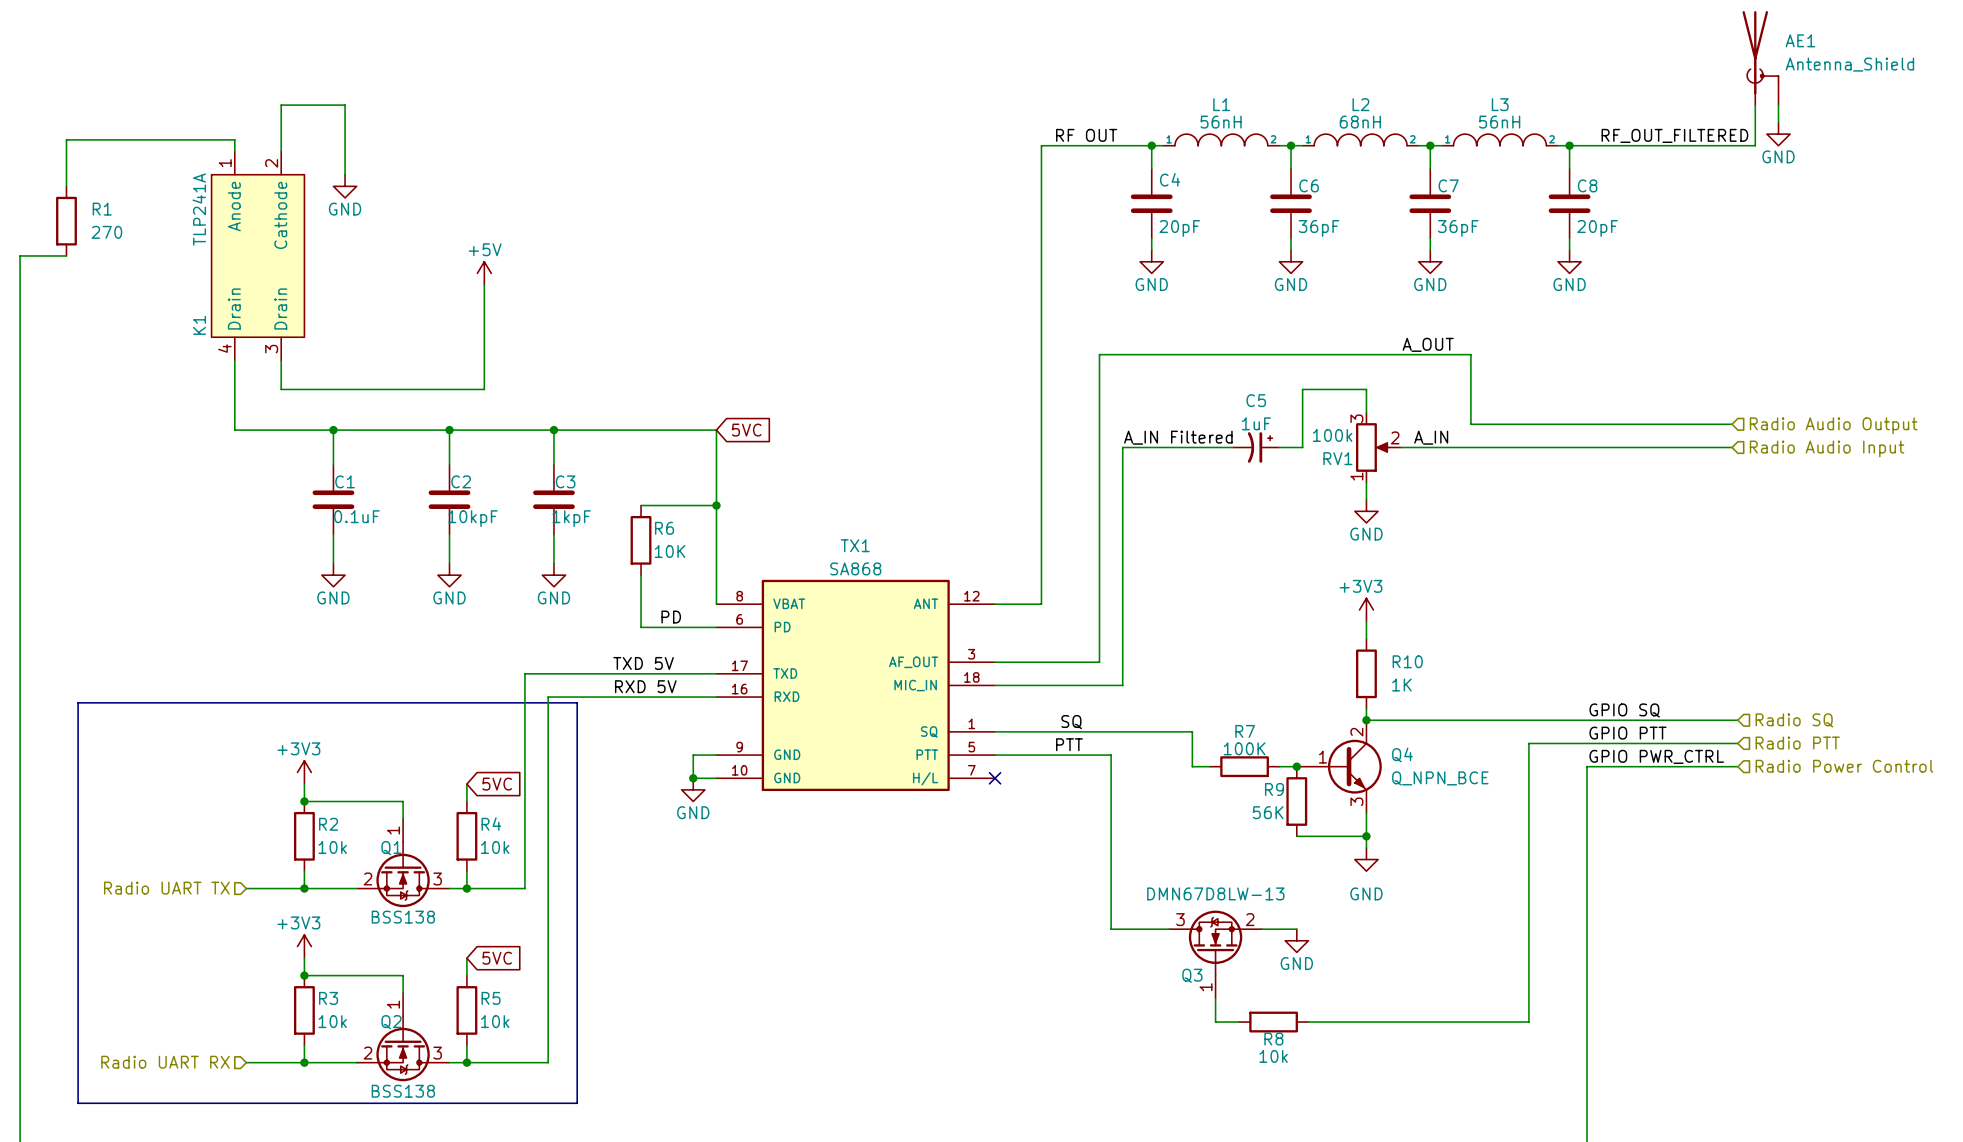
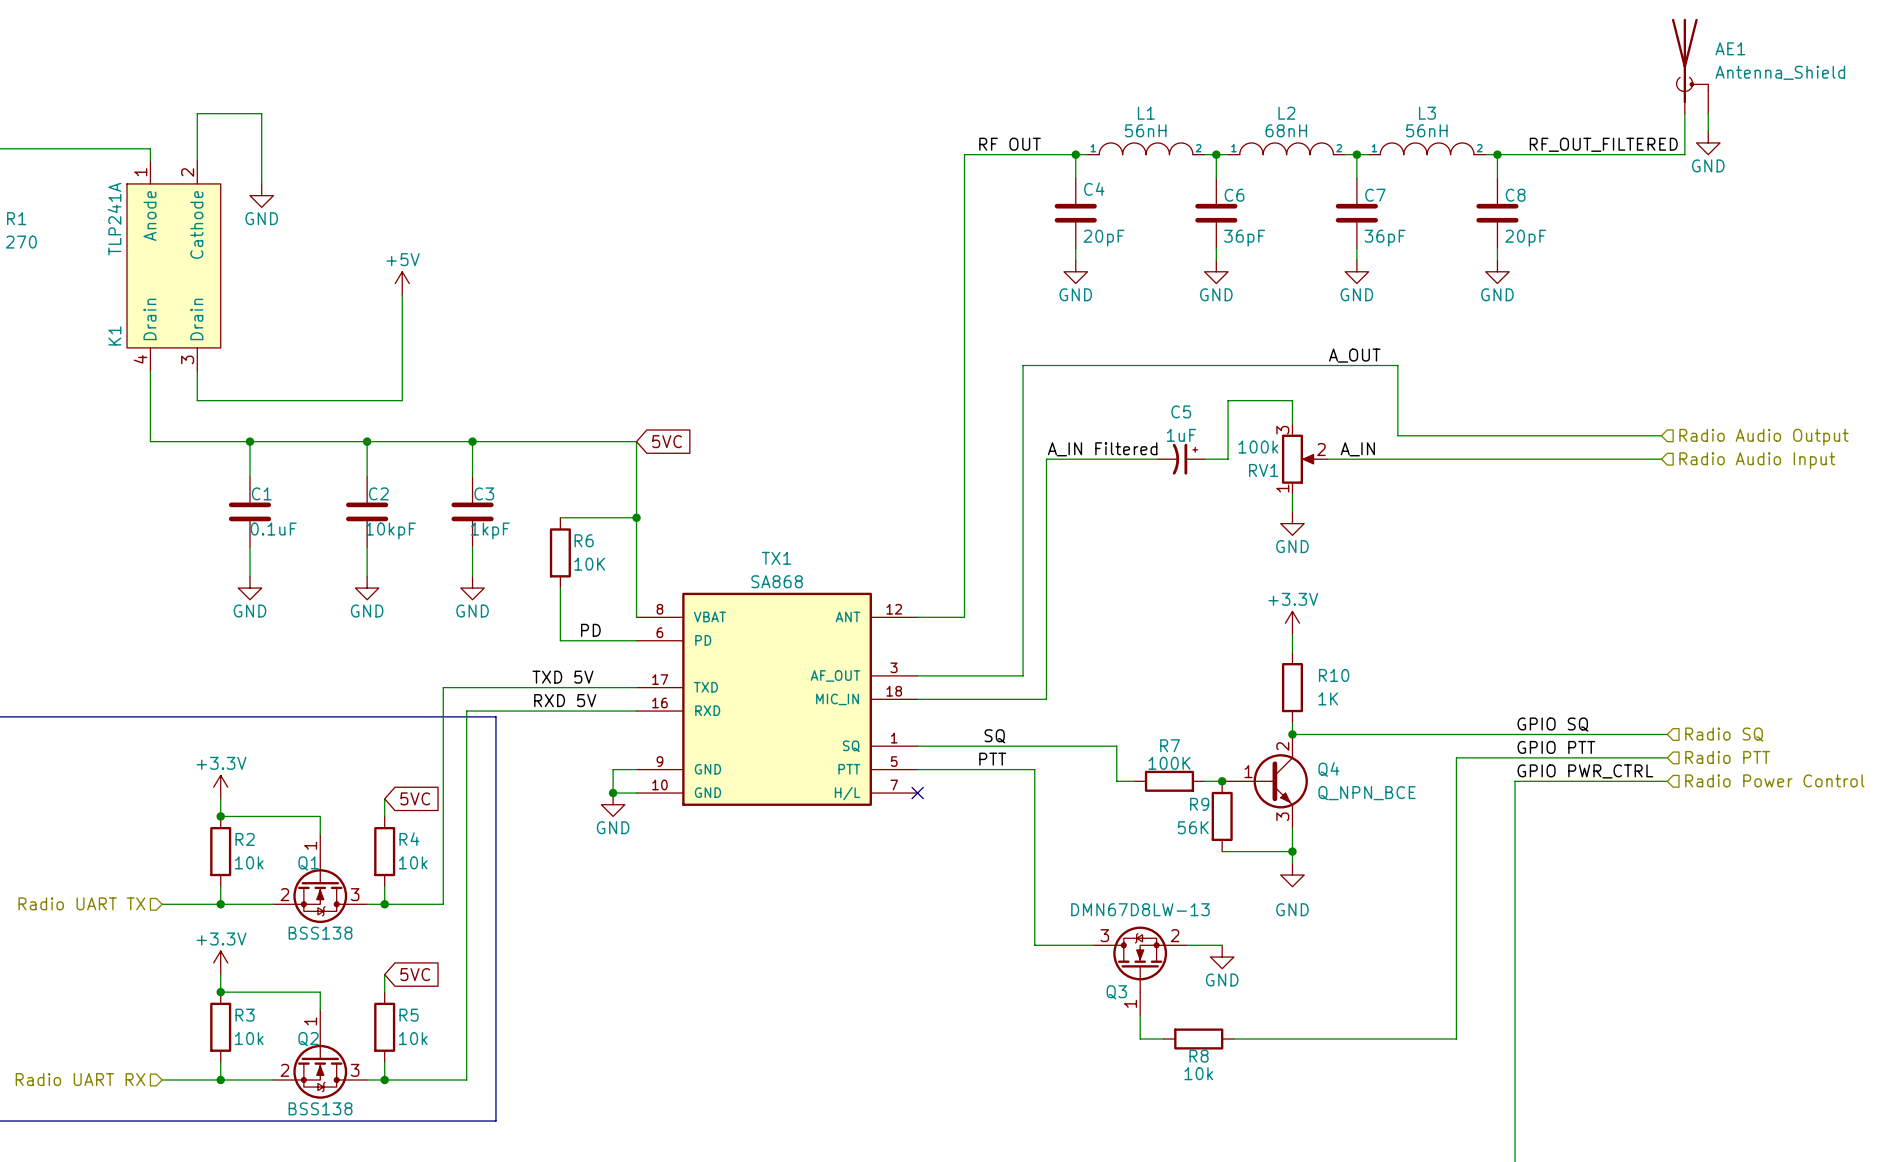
power symbol: +3V3 (1366, 609) -> +3.3V (1292, 623)
power symbol: +3V3 (304, 772) -> +3.3V (220, 787)
power symbol: +3V3 (304, 946) -> +3.3V (220, 962)

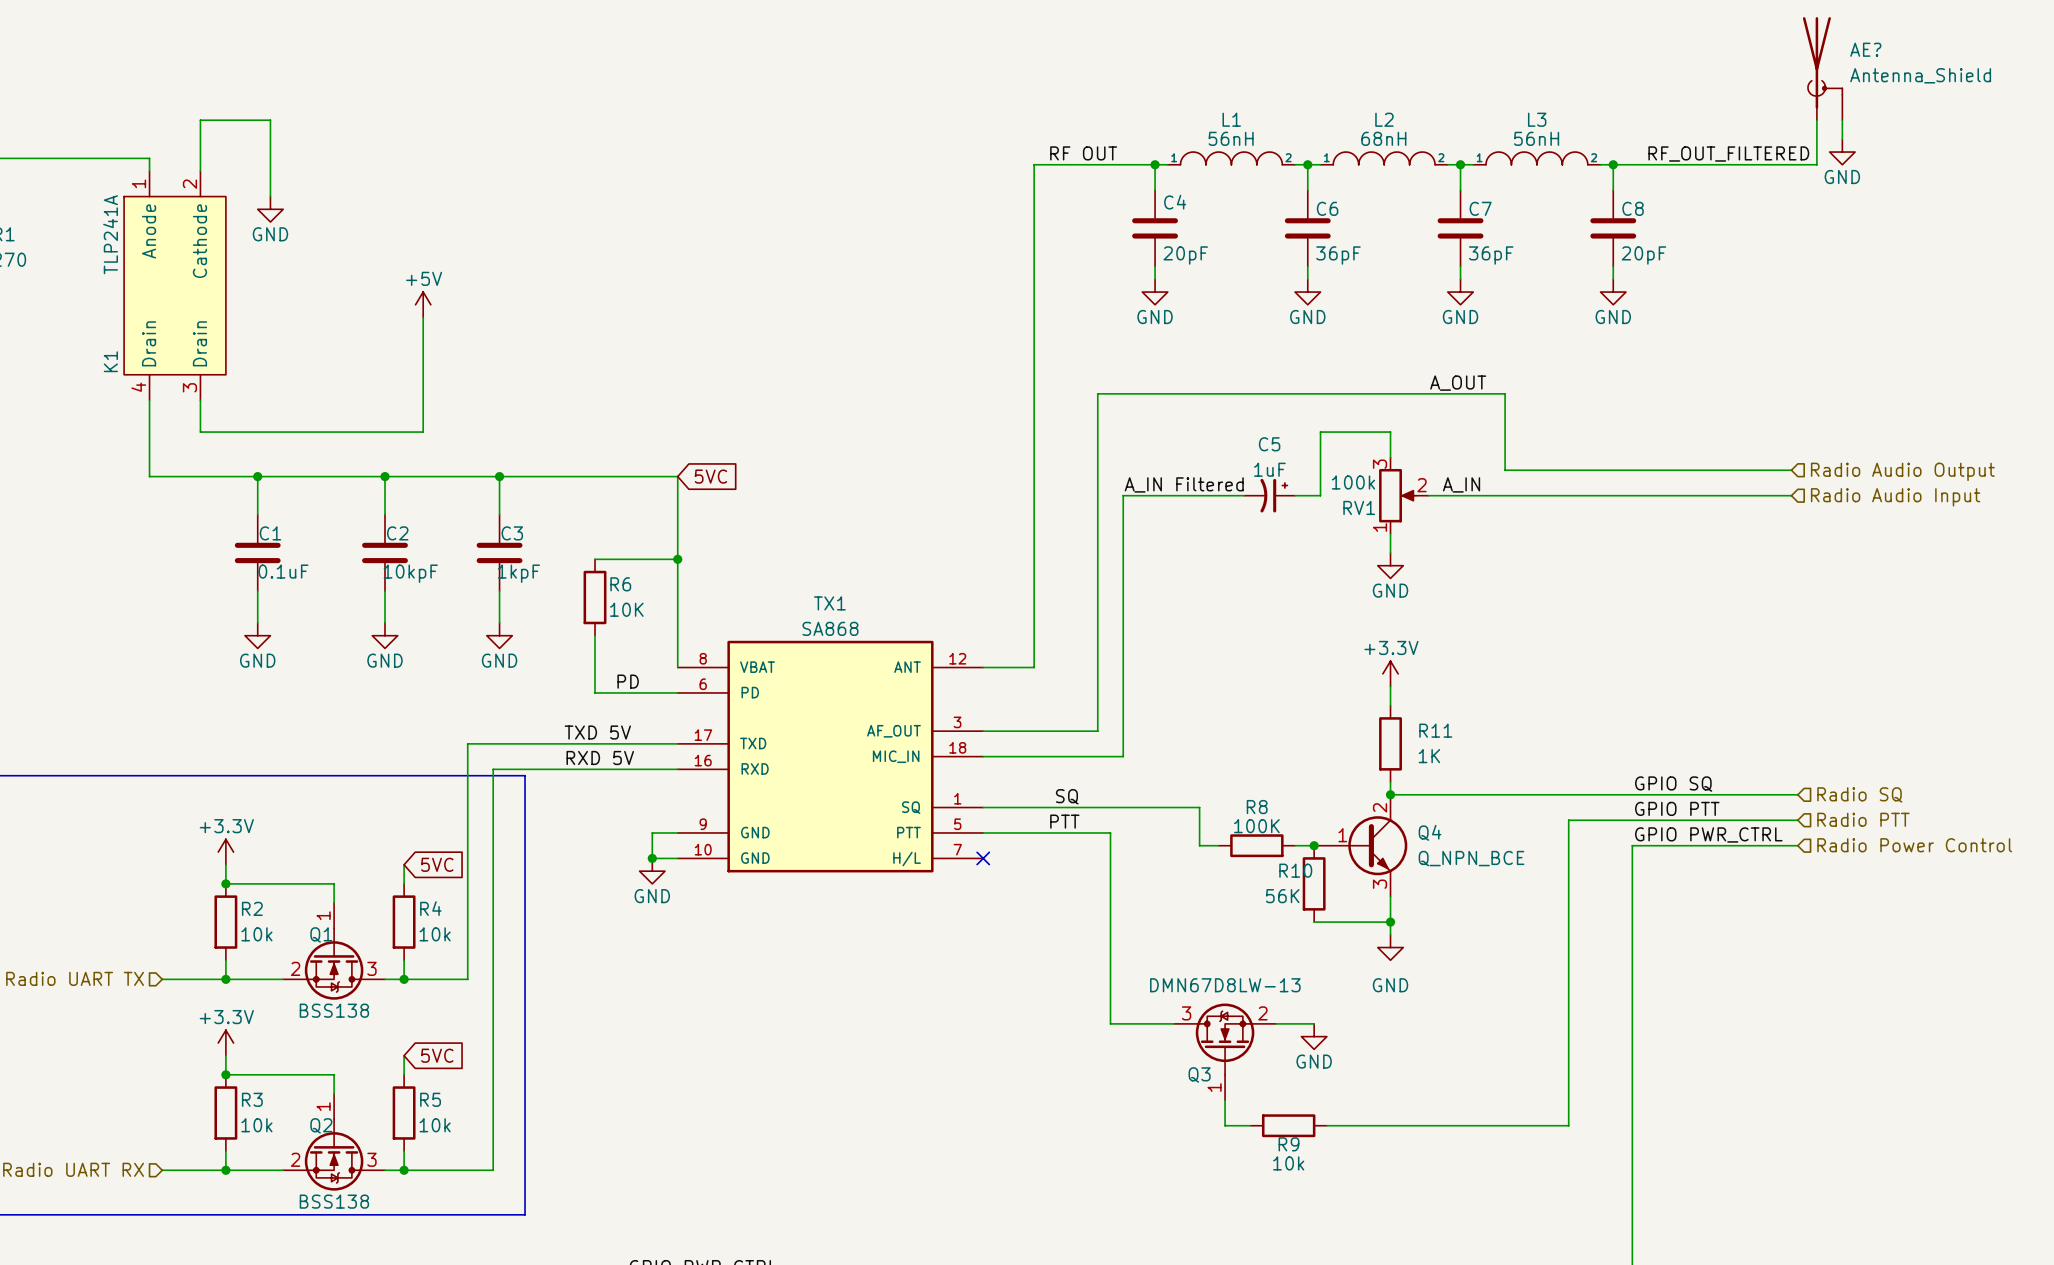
AE1 name: AE1 (1730, 48) -> AE? (1865, 49)
R10 name: R10 (1334, 675) -> R11 (1435, 730)
R7 name: R7 (1170, 745) -> R8 (1257, 807)
R9 name: R9 (1199, 804) -> R10 (1295, 870)
R8 name: R8 (1199, 1056) -> R9 (1288, 1144)

